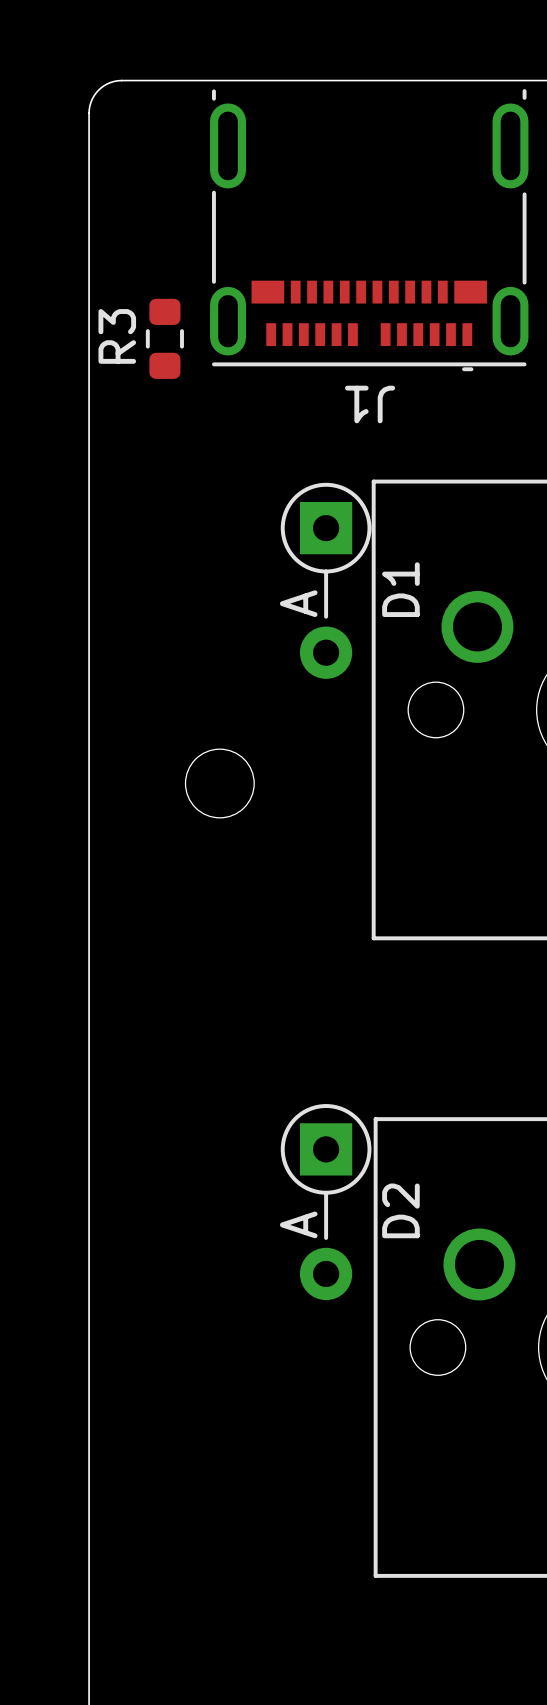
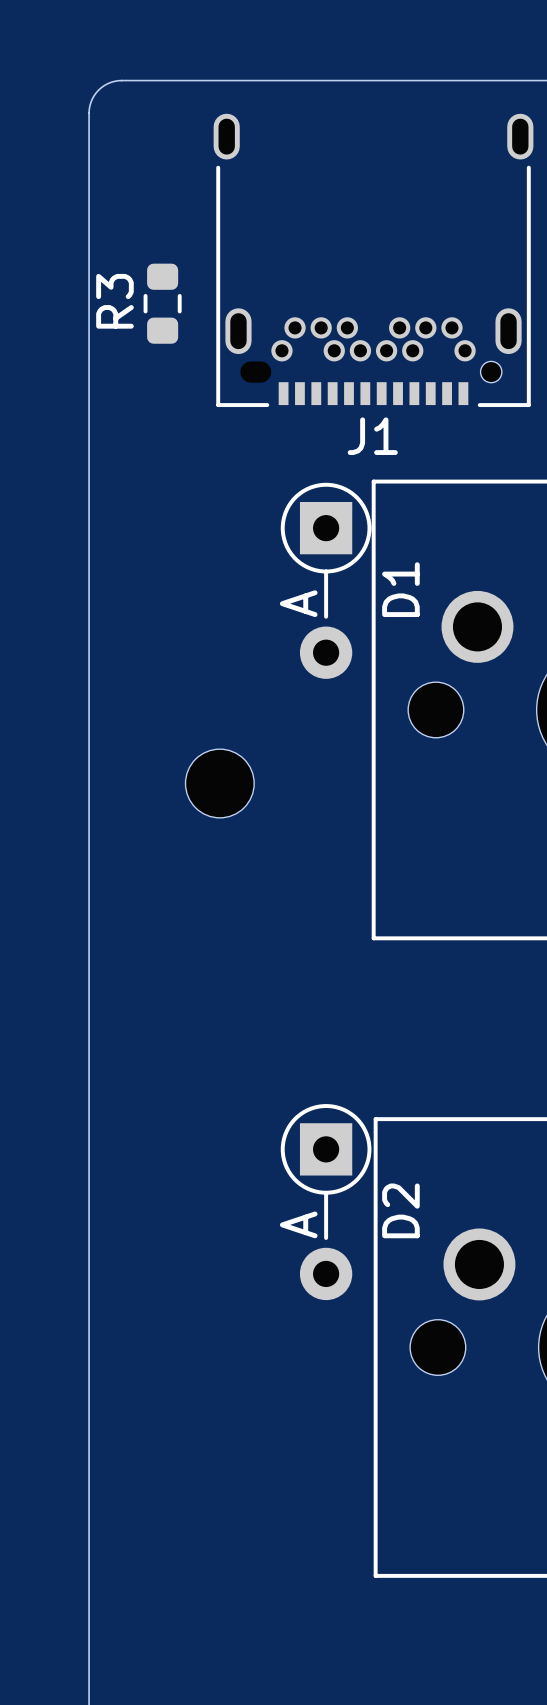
J1 footprint: [210, 89, 529, 372] -> [213, 113, 534, 408]
R3 position: (164, 338) -> (162, 303)

